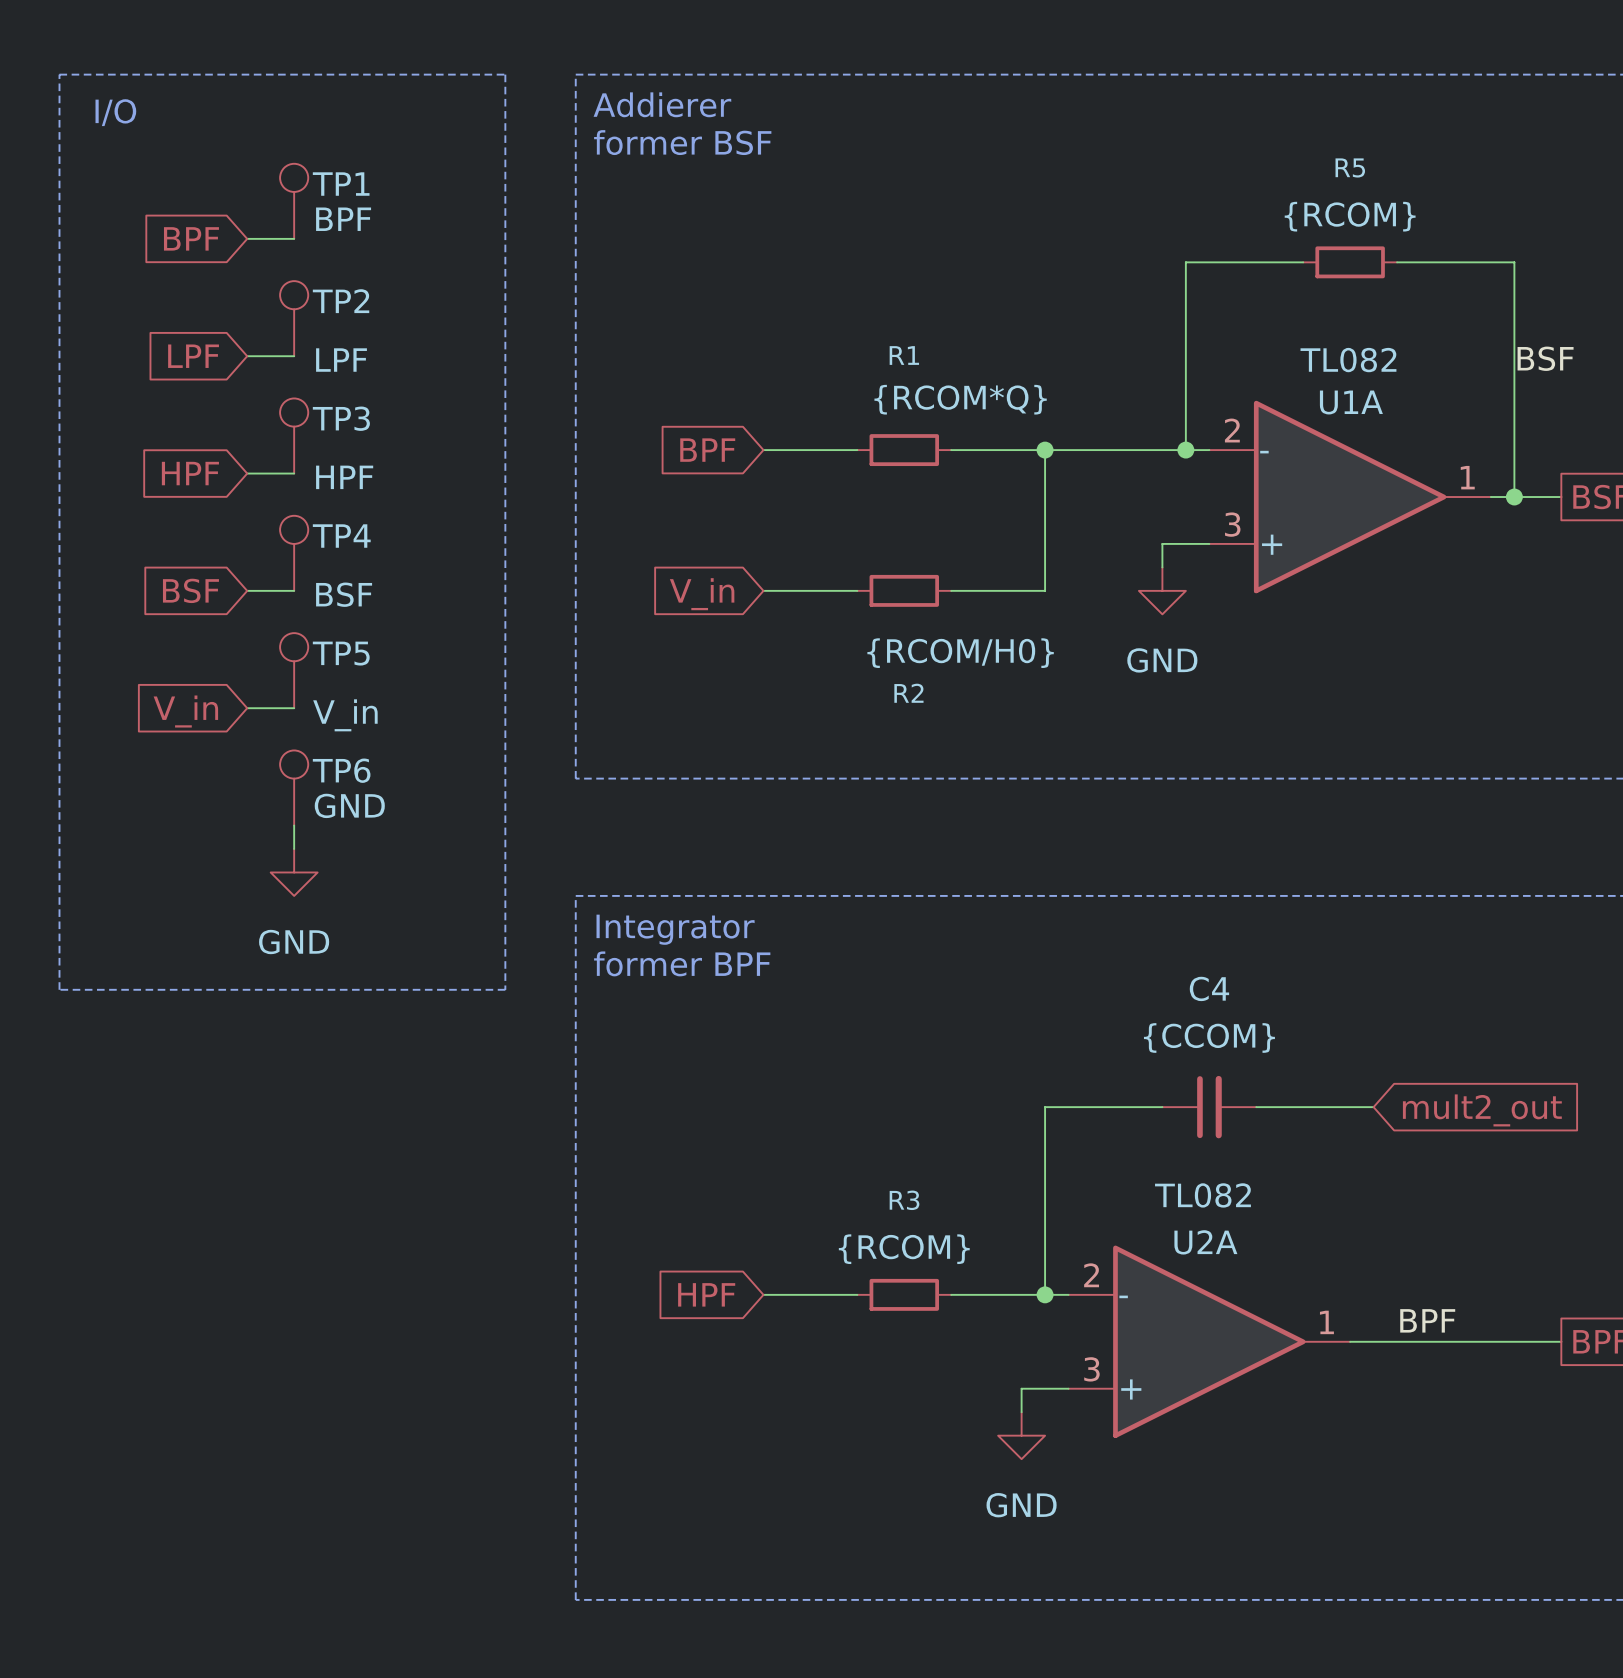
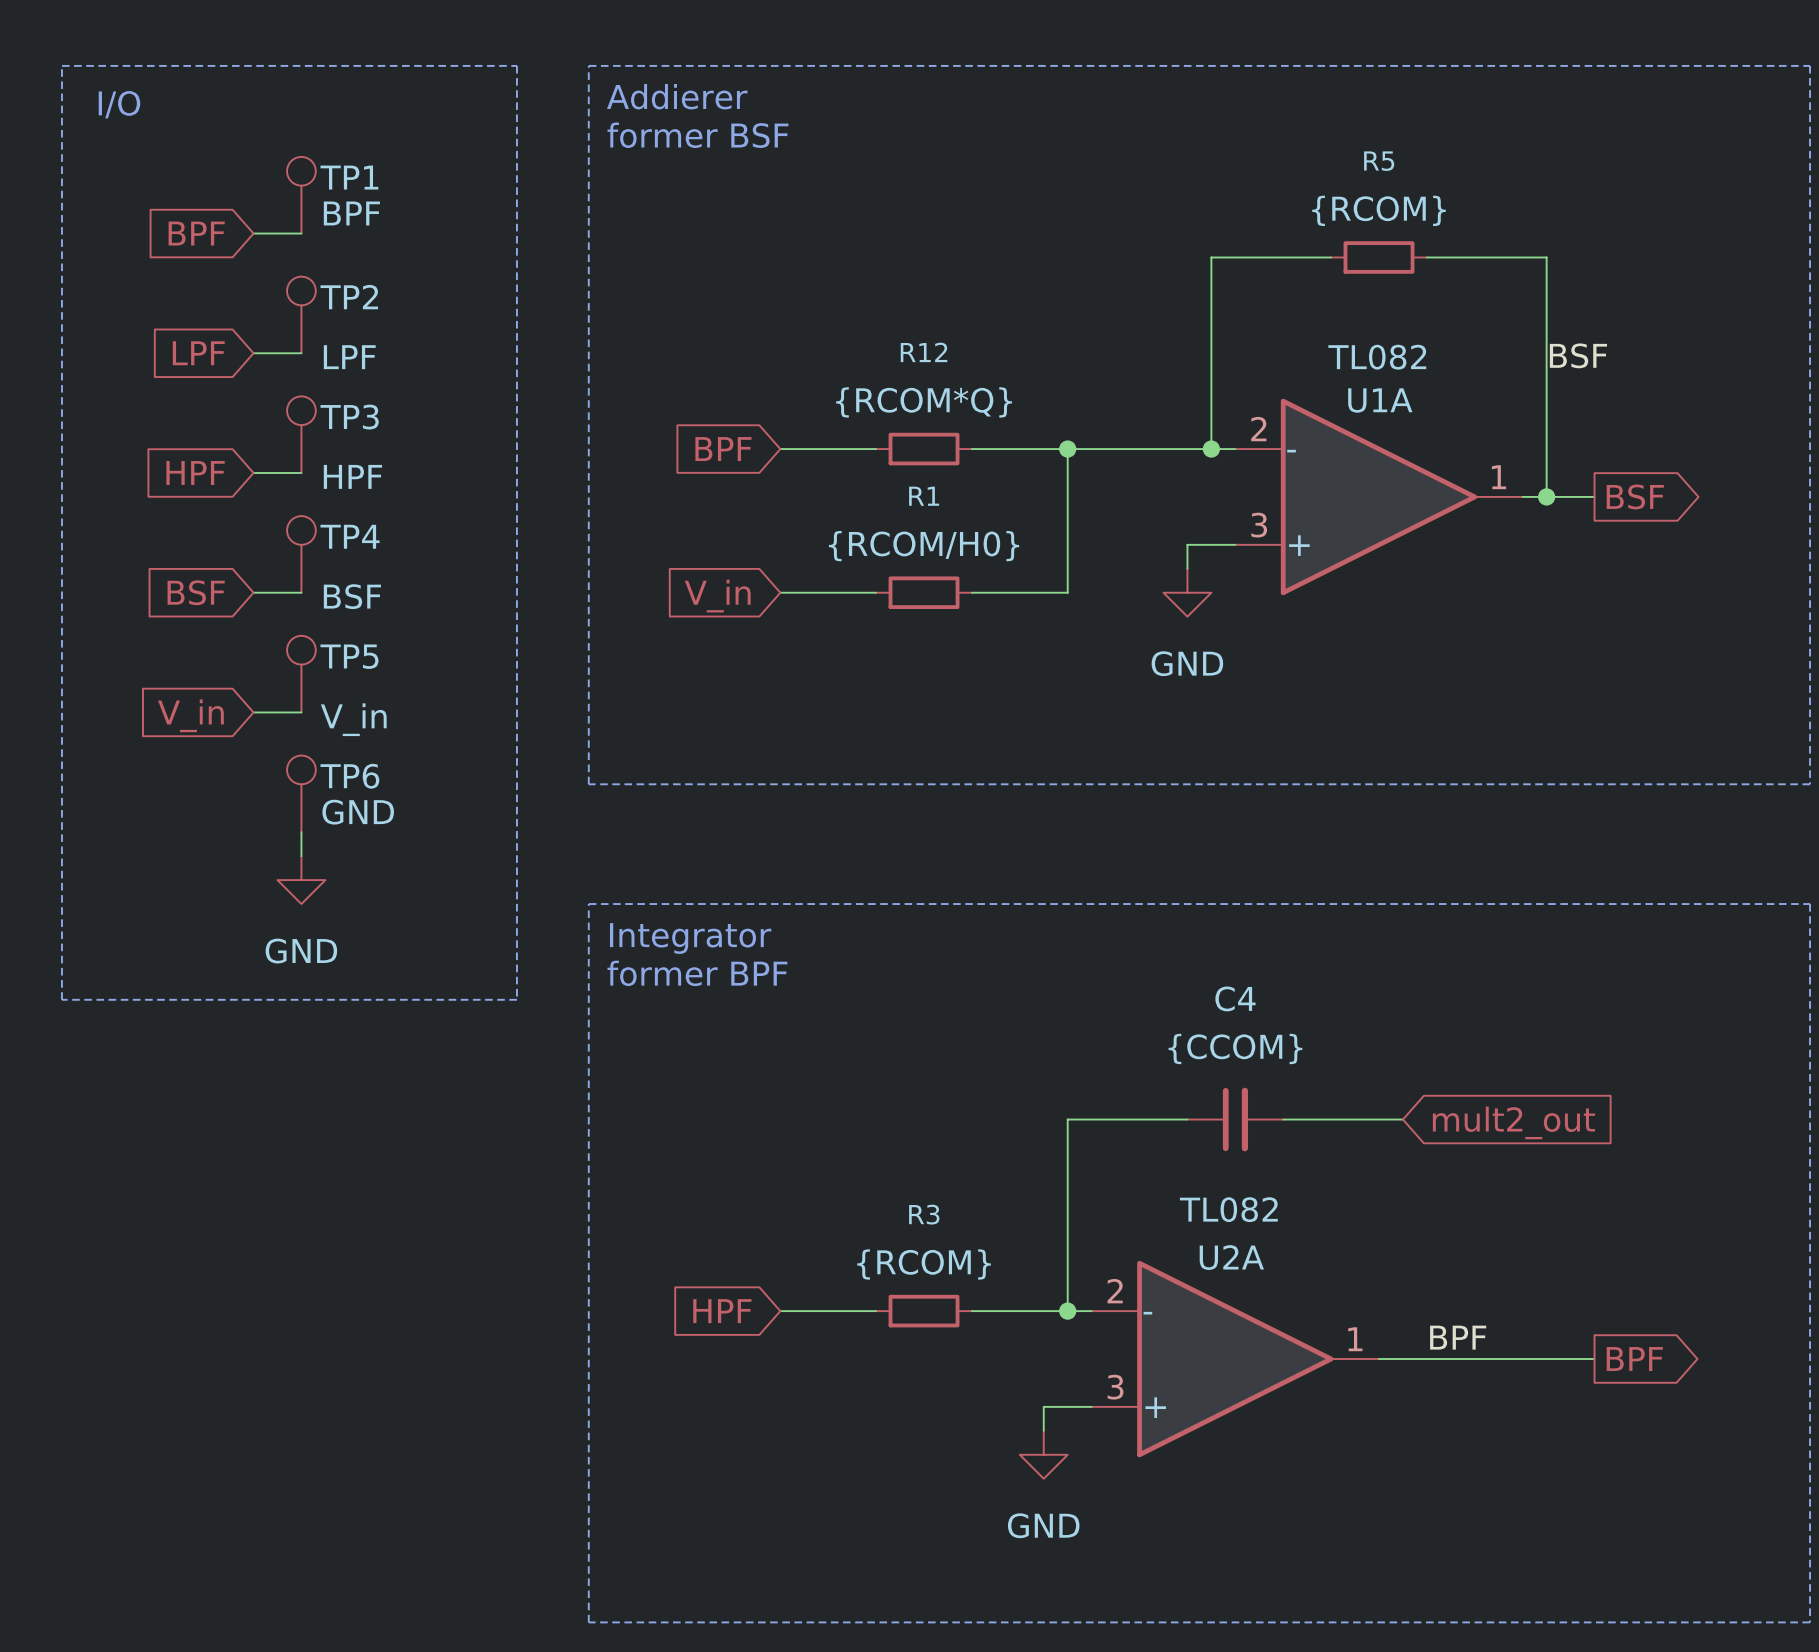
R1 name: R1 (904, 355) -> R12 (924, 352)
R1 value position: {RCOM*Q} (960, 399) -> {RCOM*Q} (924, 402)
R2 value position: {RCOM/H0} (960, 653) -> {RCOM/H0} (924, 546)
R2 name: R2 (908, 693) -> R1 (924, 496)

